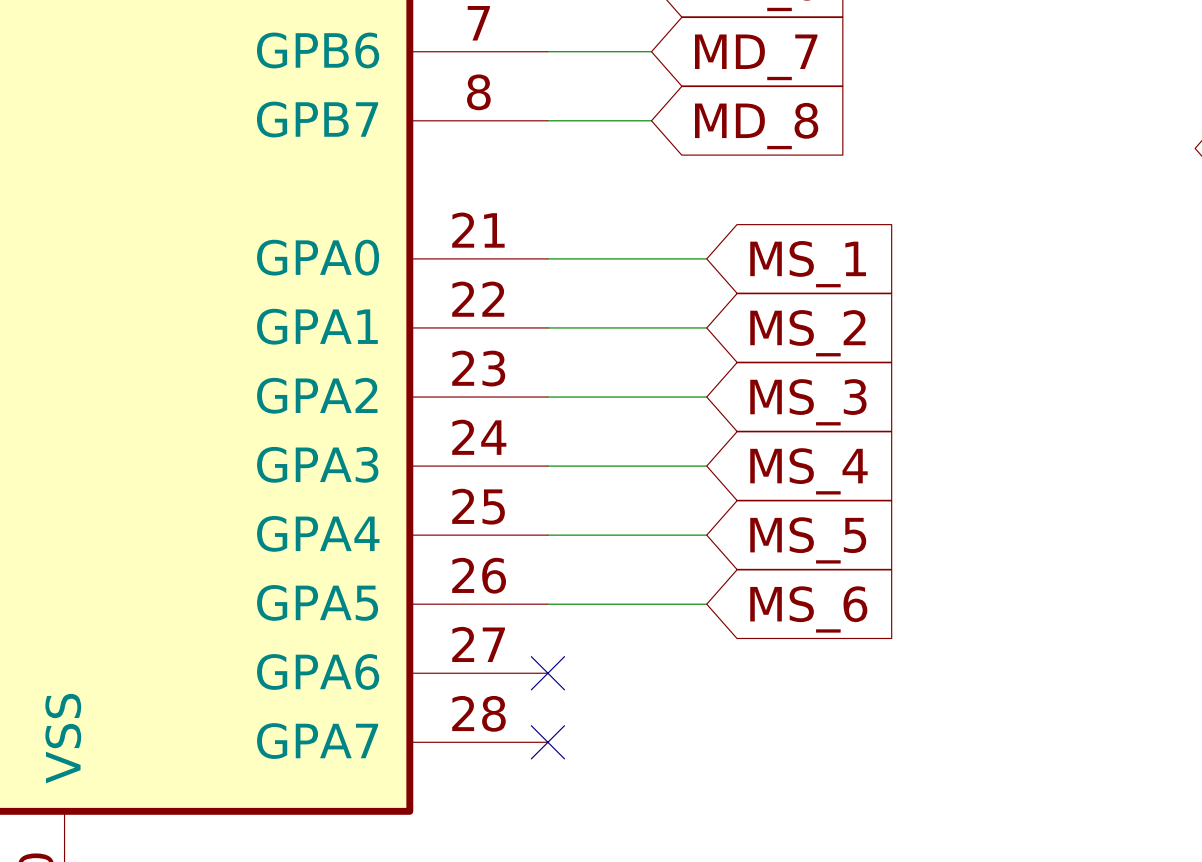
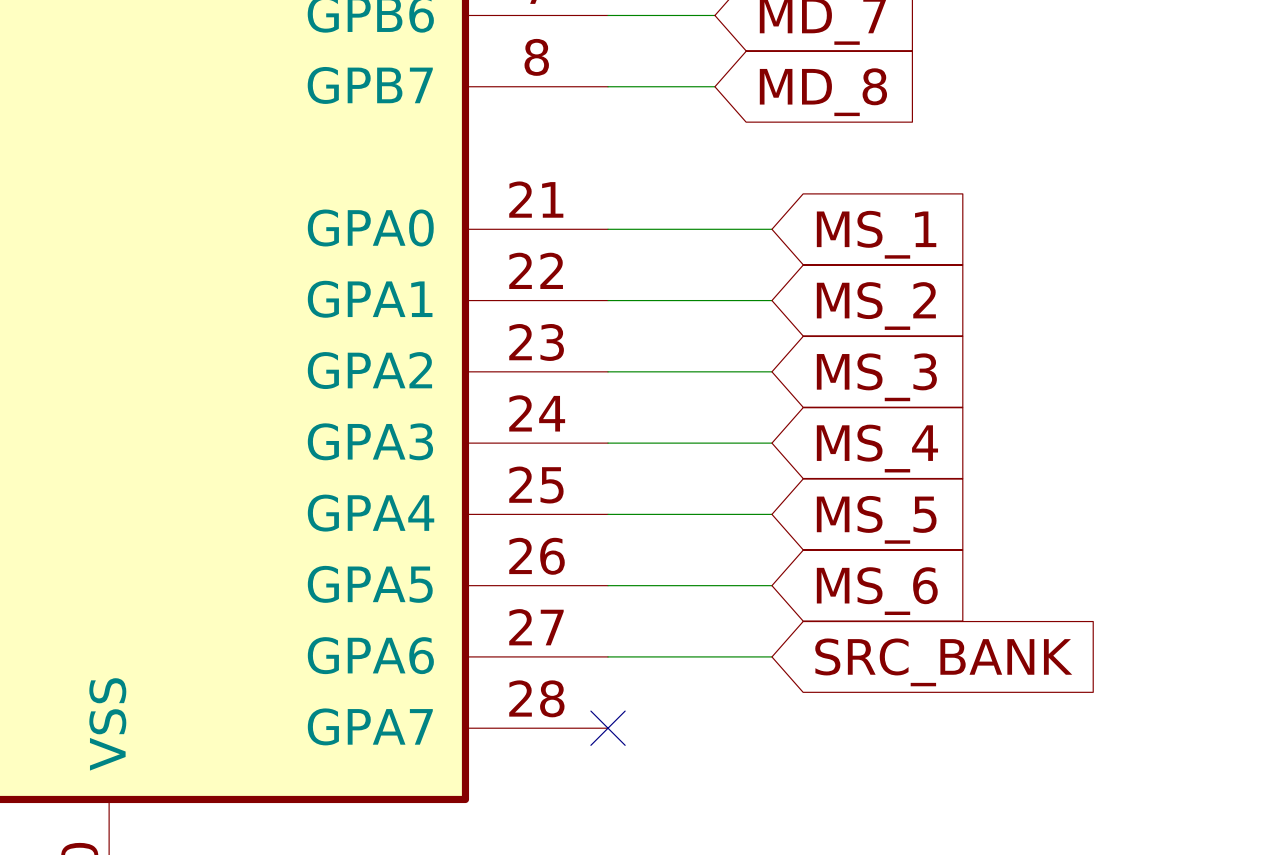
wire: none -> (608, 656) (771, 656)
no-connect mark: (547, 673) -> none
global label: none -> SRC_BANK (943, 662)

